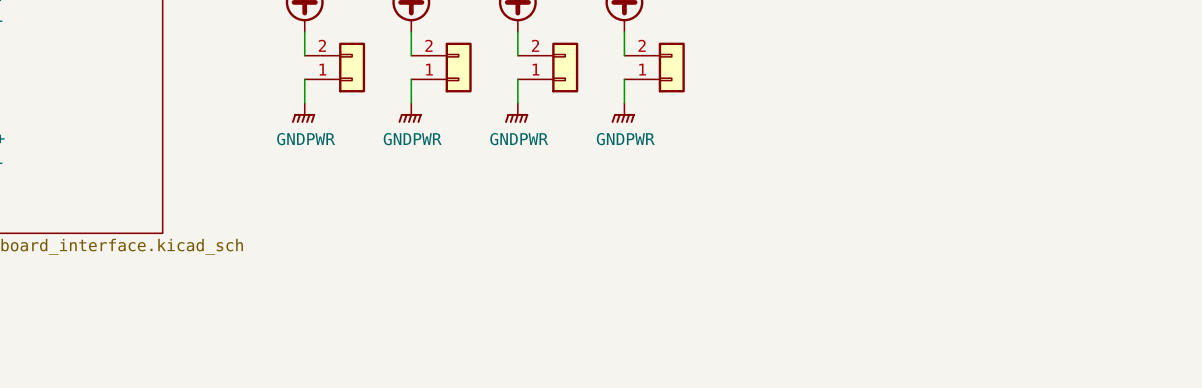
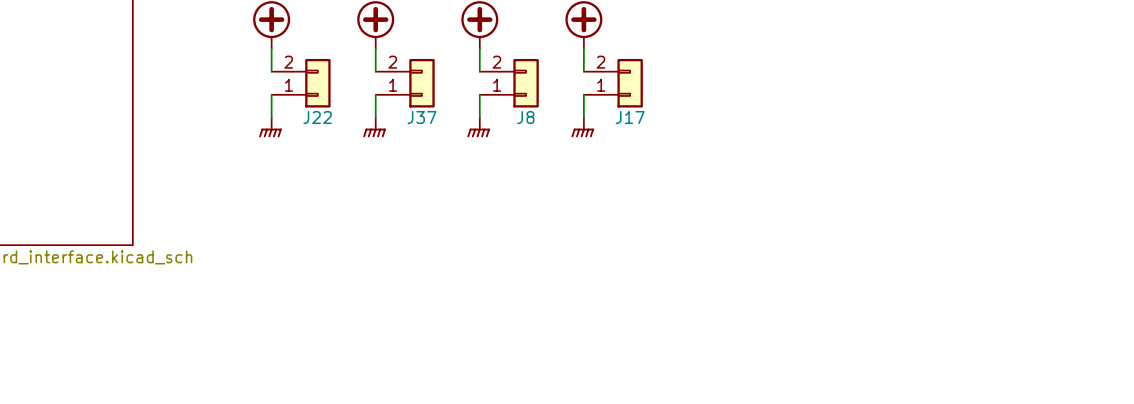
J22 name: none -> J22 (317, 117)
J37 name: none -> J37 (421, 117)
J8 name: none -> J8 (525, 117)
J17 name: none -> J17 (630, 117)
power symbol text: GNDPWR (306, 139) -> none
power symbol text: GNDPWR (412, 139) -> none
power symbol text: GNDPWR (519, 139) -> none
power symbol text: GNDPWR (625, 139) -> none

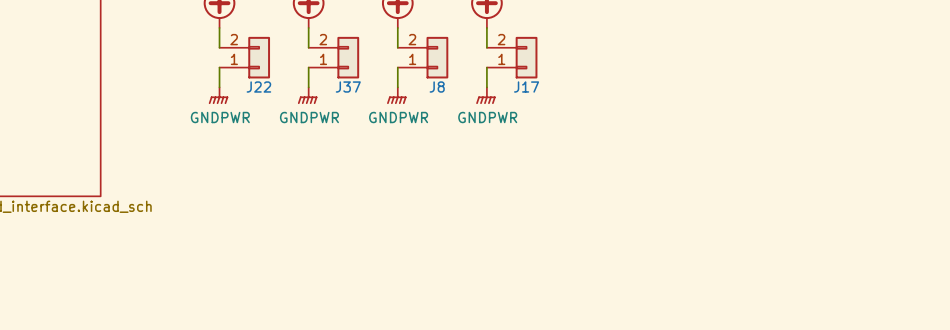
power symbol text: none -> GNDPWR (220, 117)
power symbol text: none -> GNDPWR (309, 117)
power symbol text: none -> GNDPWR (398, 117)
power symbol text: none -> GNDPWR (487, 117)

